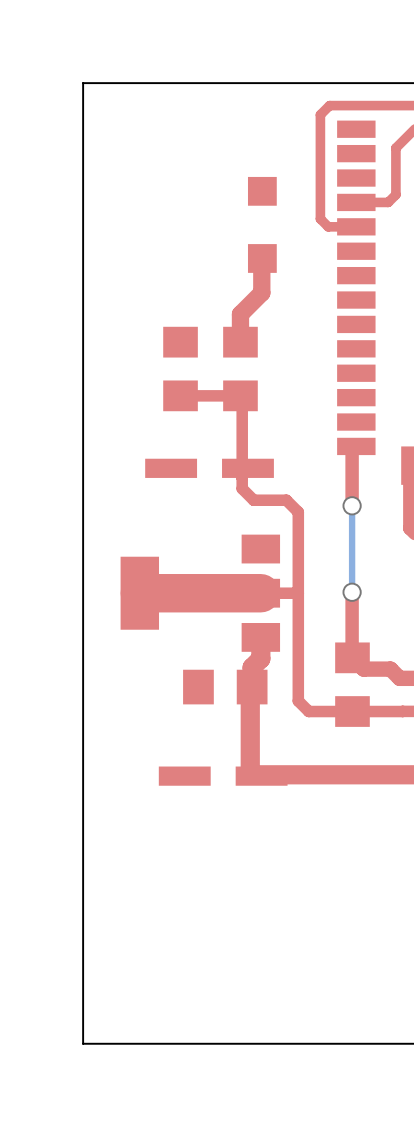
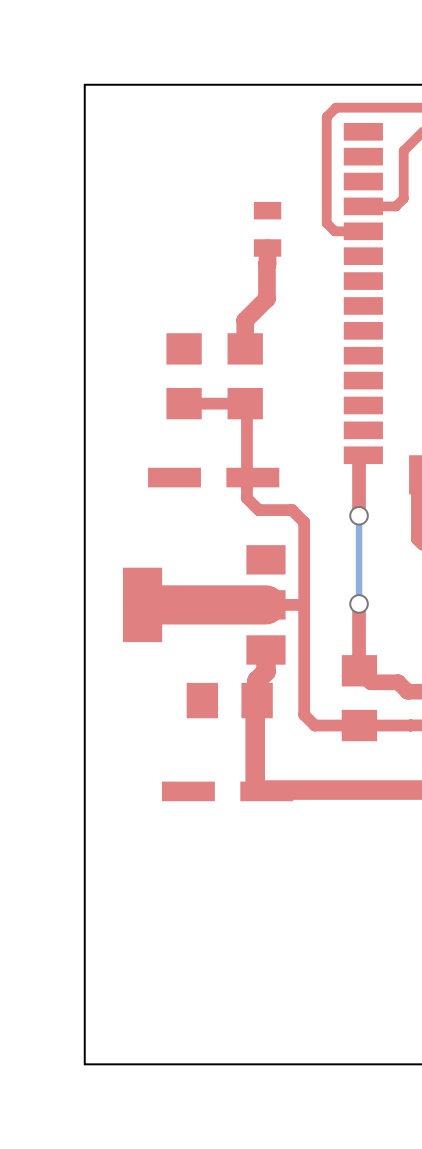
part footprint: [247, 176, 277, 273] -> [253, 201, 282, 257]

